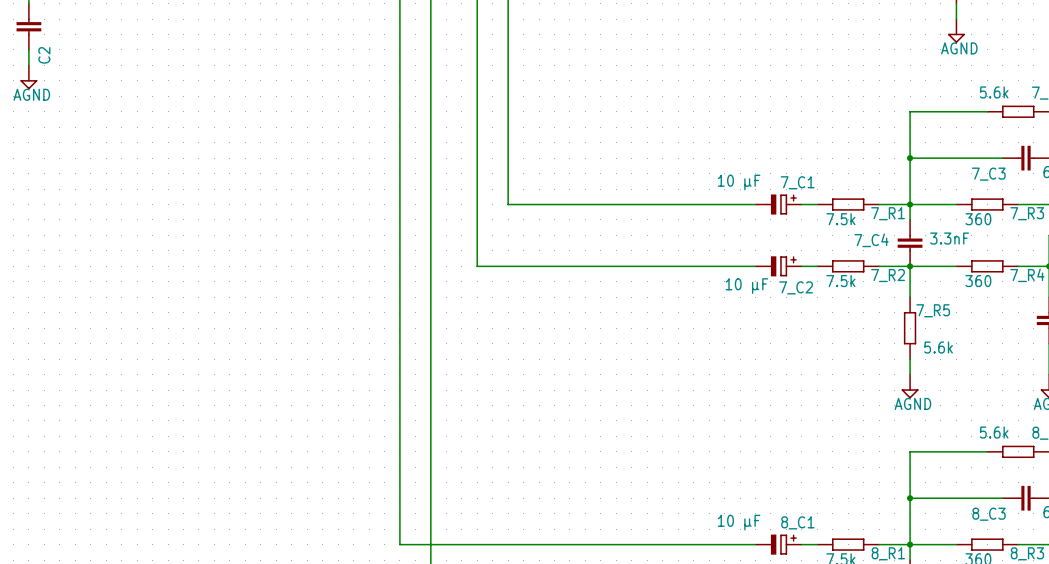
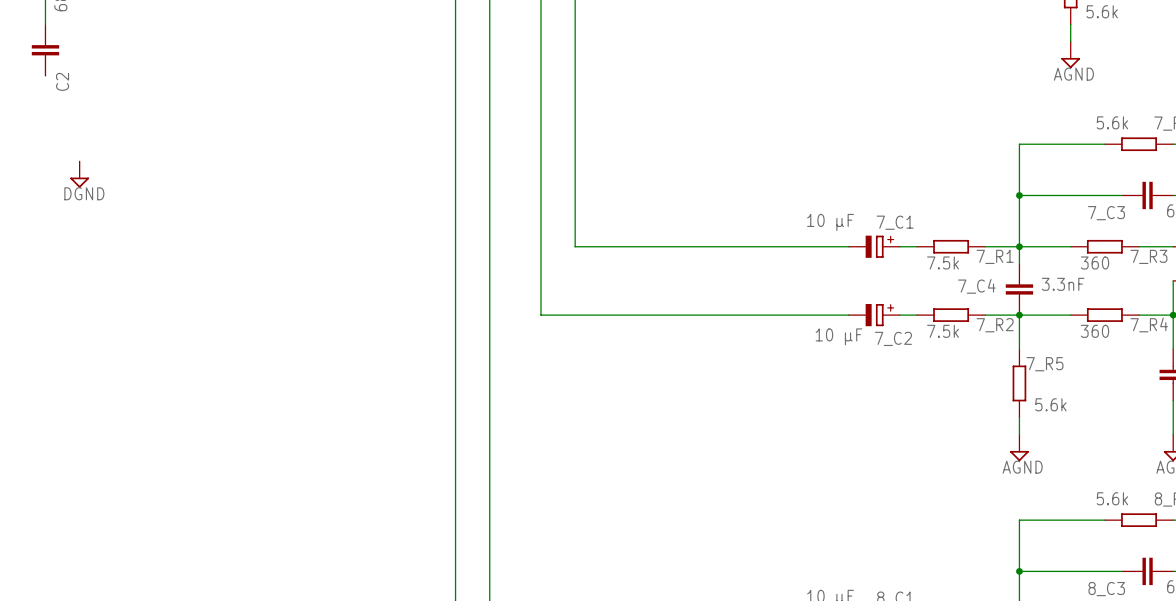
wire: (28, 49) (28, 65) -> none
power symbol: AGND (28, 77) -> none
power symbol: none -> DGND (79, 174)

